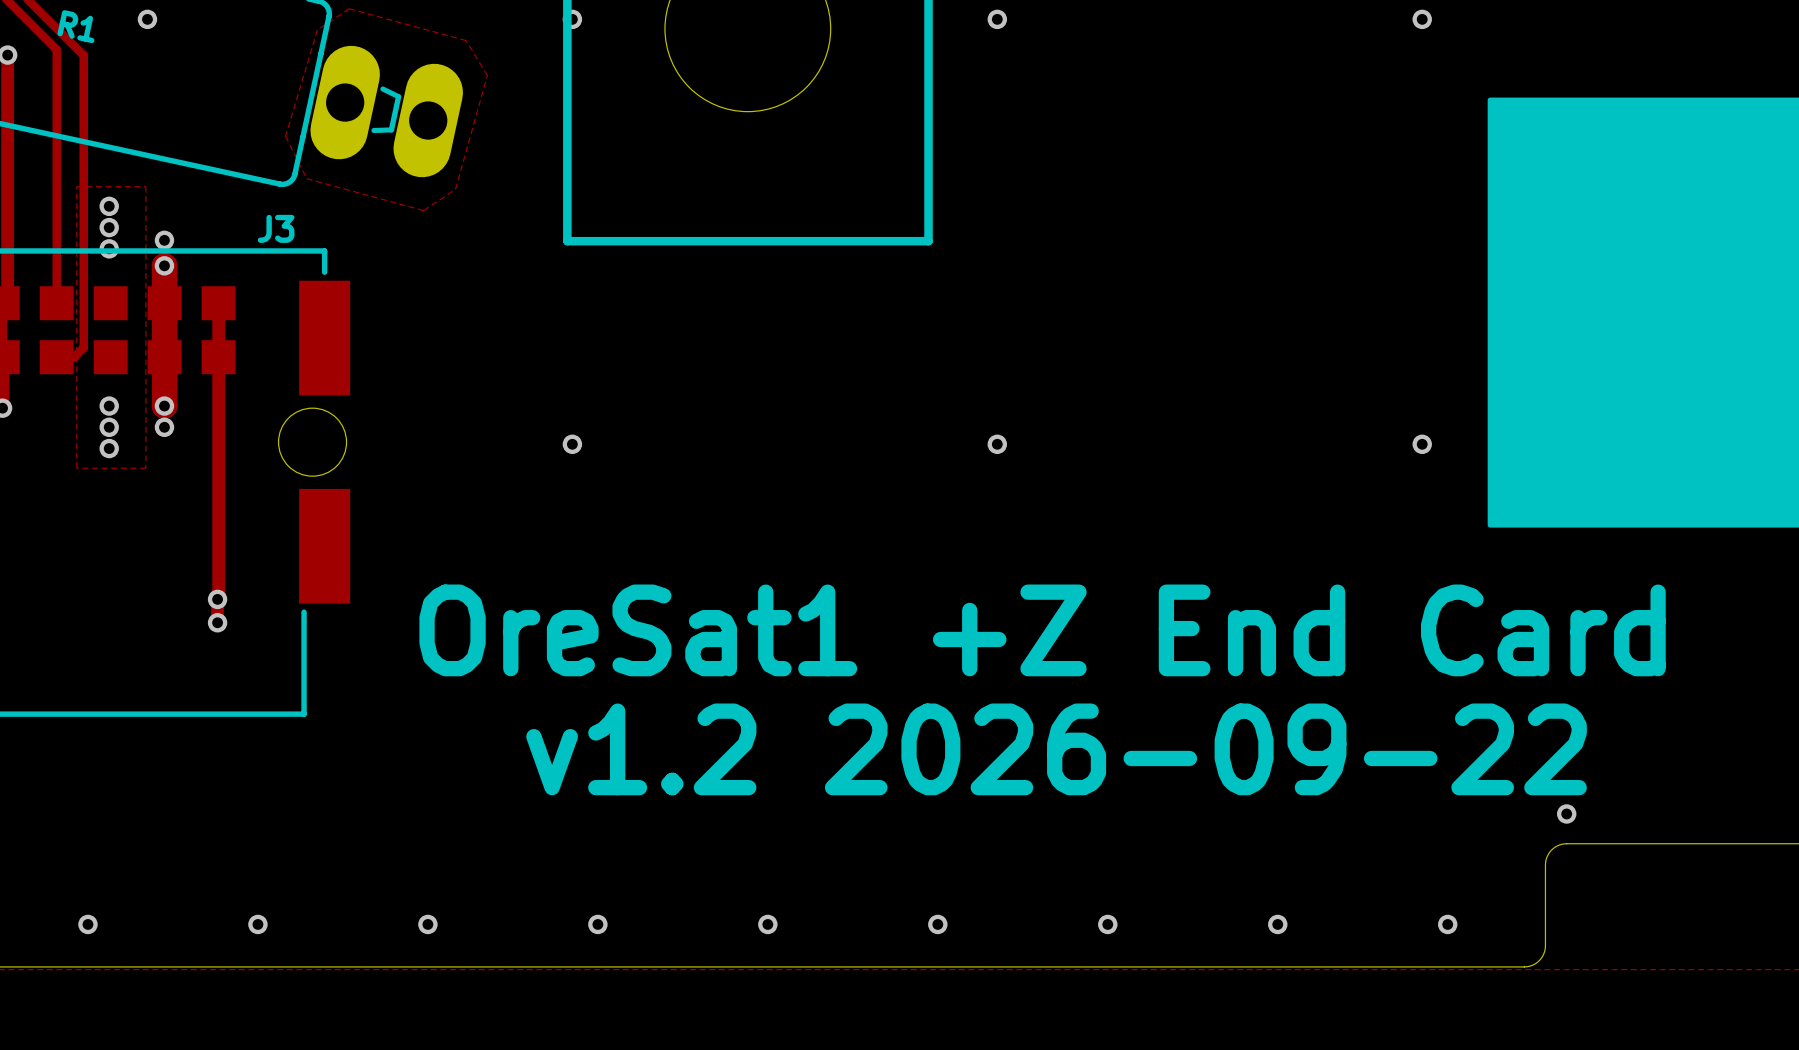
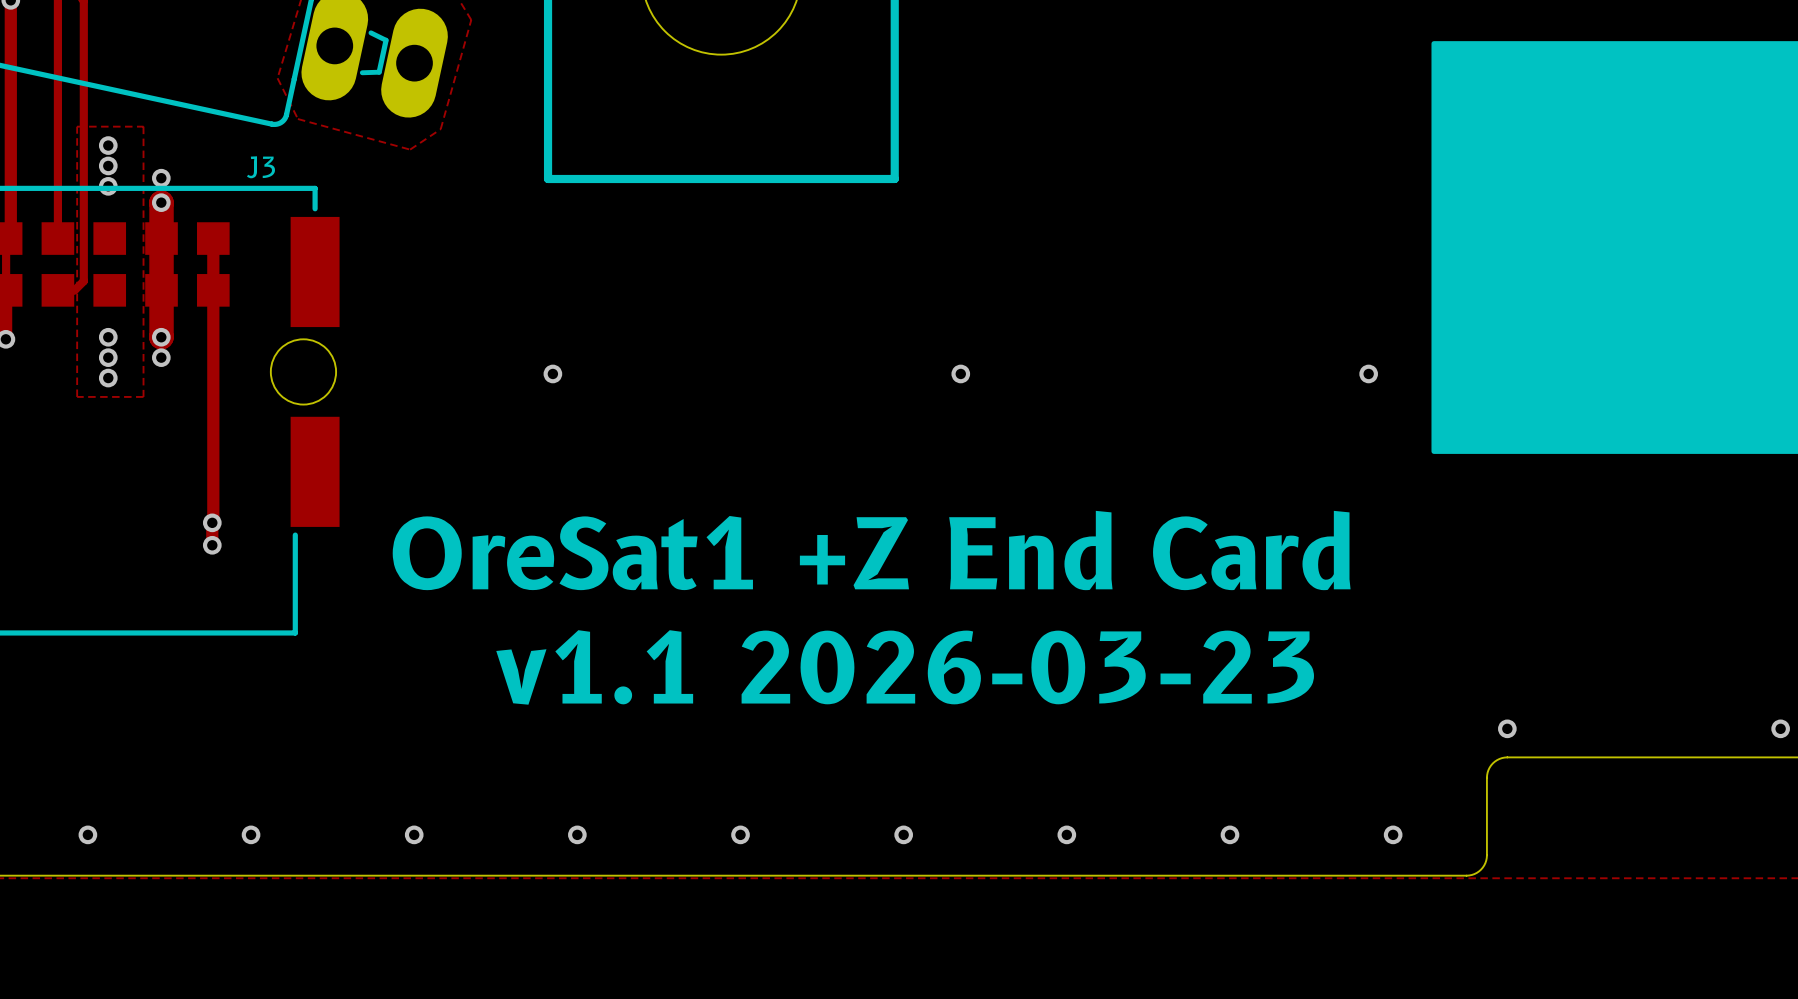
text: v1.2 2026-09-22 (1056, 749) -> v1.1 2026-03-23 (905, 667)

